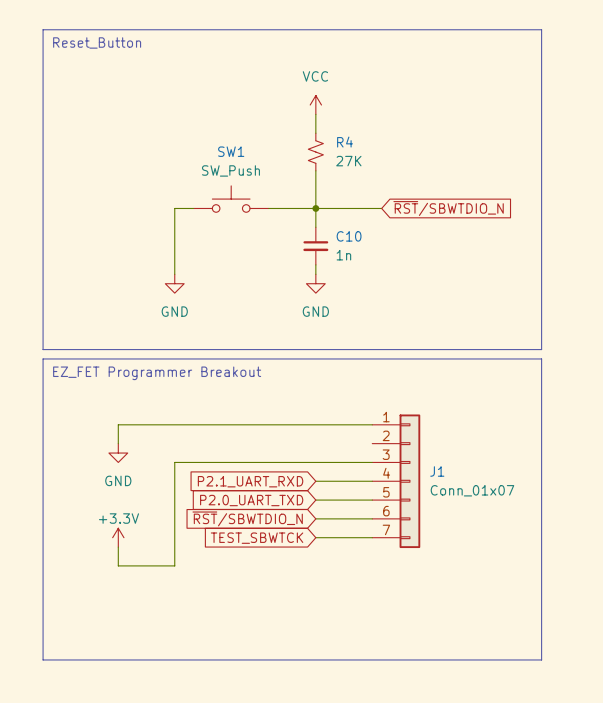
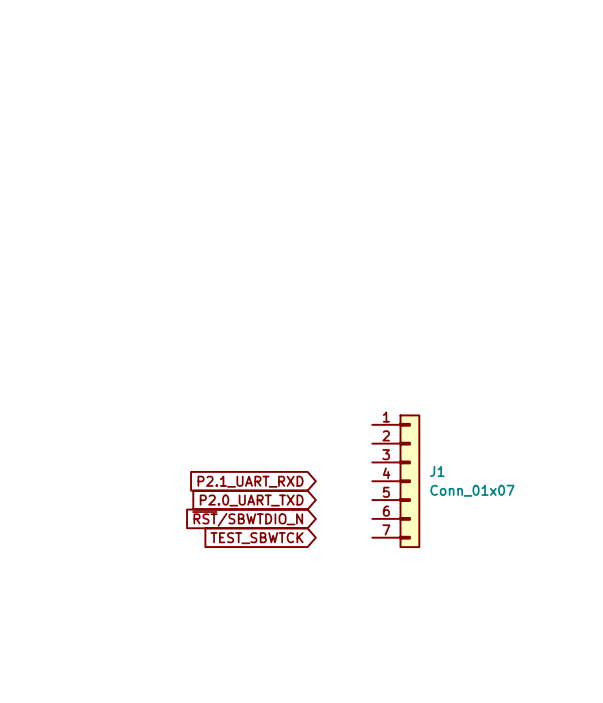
line: (43, 29) (541, 29) (541, 349) (43, 349) (43, 29) -> none
text: Reset_Button (97, 42) -> none
power symbol: VCC (315, 105) -> none
wire: (315, 114) (315, 133) -> none
R4: 27K (315, 152) -> none
wire: (315, 170) (315, 227) -> none
SW1: SW_Push (231, 199) -> none
wire: (193, 208) (174, 208) (174, 274) -> none
wire: (268, 208) (381, 208) -> none
junction: (315, 208) -> none
global label: ~{RST}/SBWTDIO_N (448, 208) -> none
C10: 1n (315, 246) -> none
wire: (315, 264) (315, 274) -> none
power symbol: GND (174, 283) -> none
power symbol: GND (315, 283) -> none
line: (43, 358) (43, 659) (541, 659) (541, 358) (43, 358) -> none
text: EZ_FET Programmer Breakout (157, 373) -> none
wire: (372, 424) (118, 424) (118, 443) -> none
power symbol: GND (118, 453) -> none
wire: (372, 462) (174, 462) (174, 565) (118, 565) (118, 547) -> none
wire: (315, 481) (372, 481) -> none
wire: (315, 500) (372, 500) -> none
wire: (315, 518) (372, 518) -> none
power symbol: +3.3V (118, 537) -> none
wire: (315, 537) (372, 537) -> none

